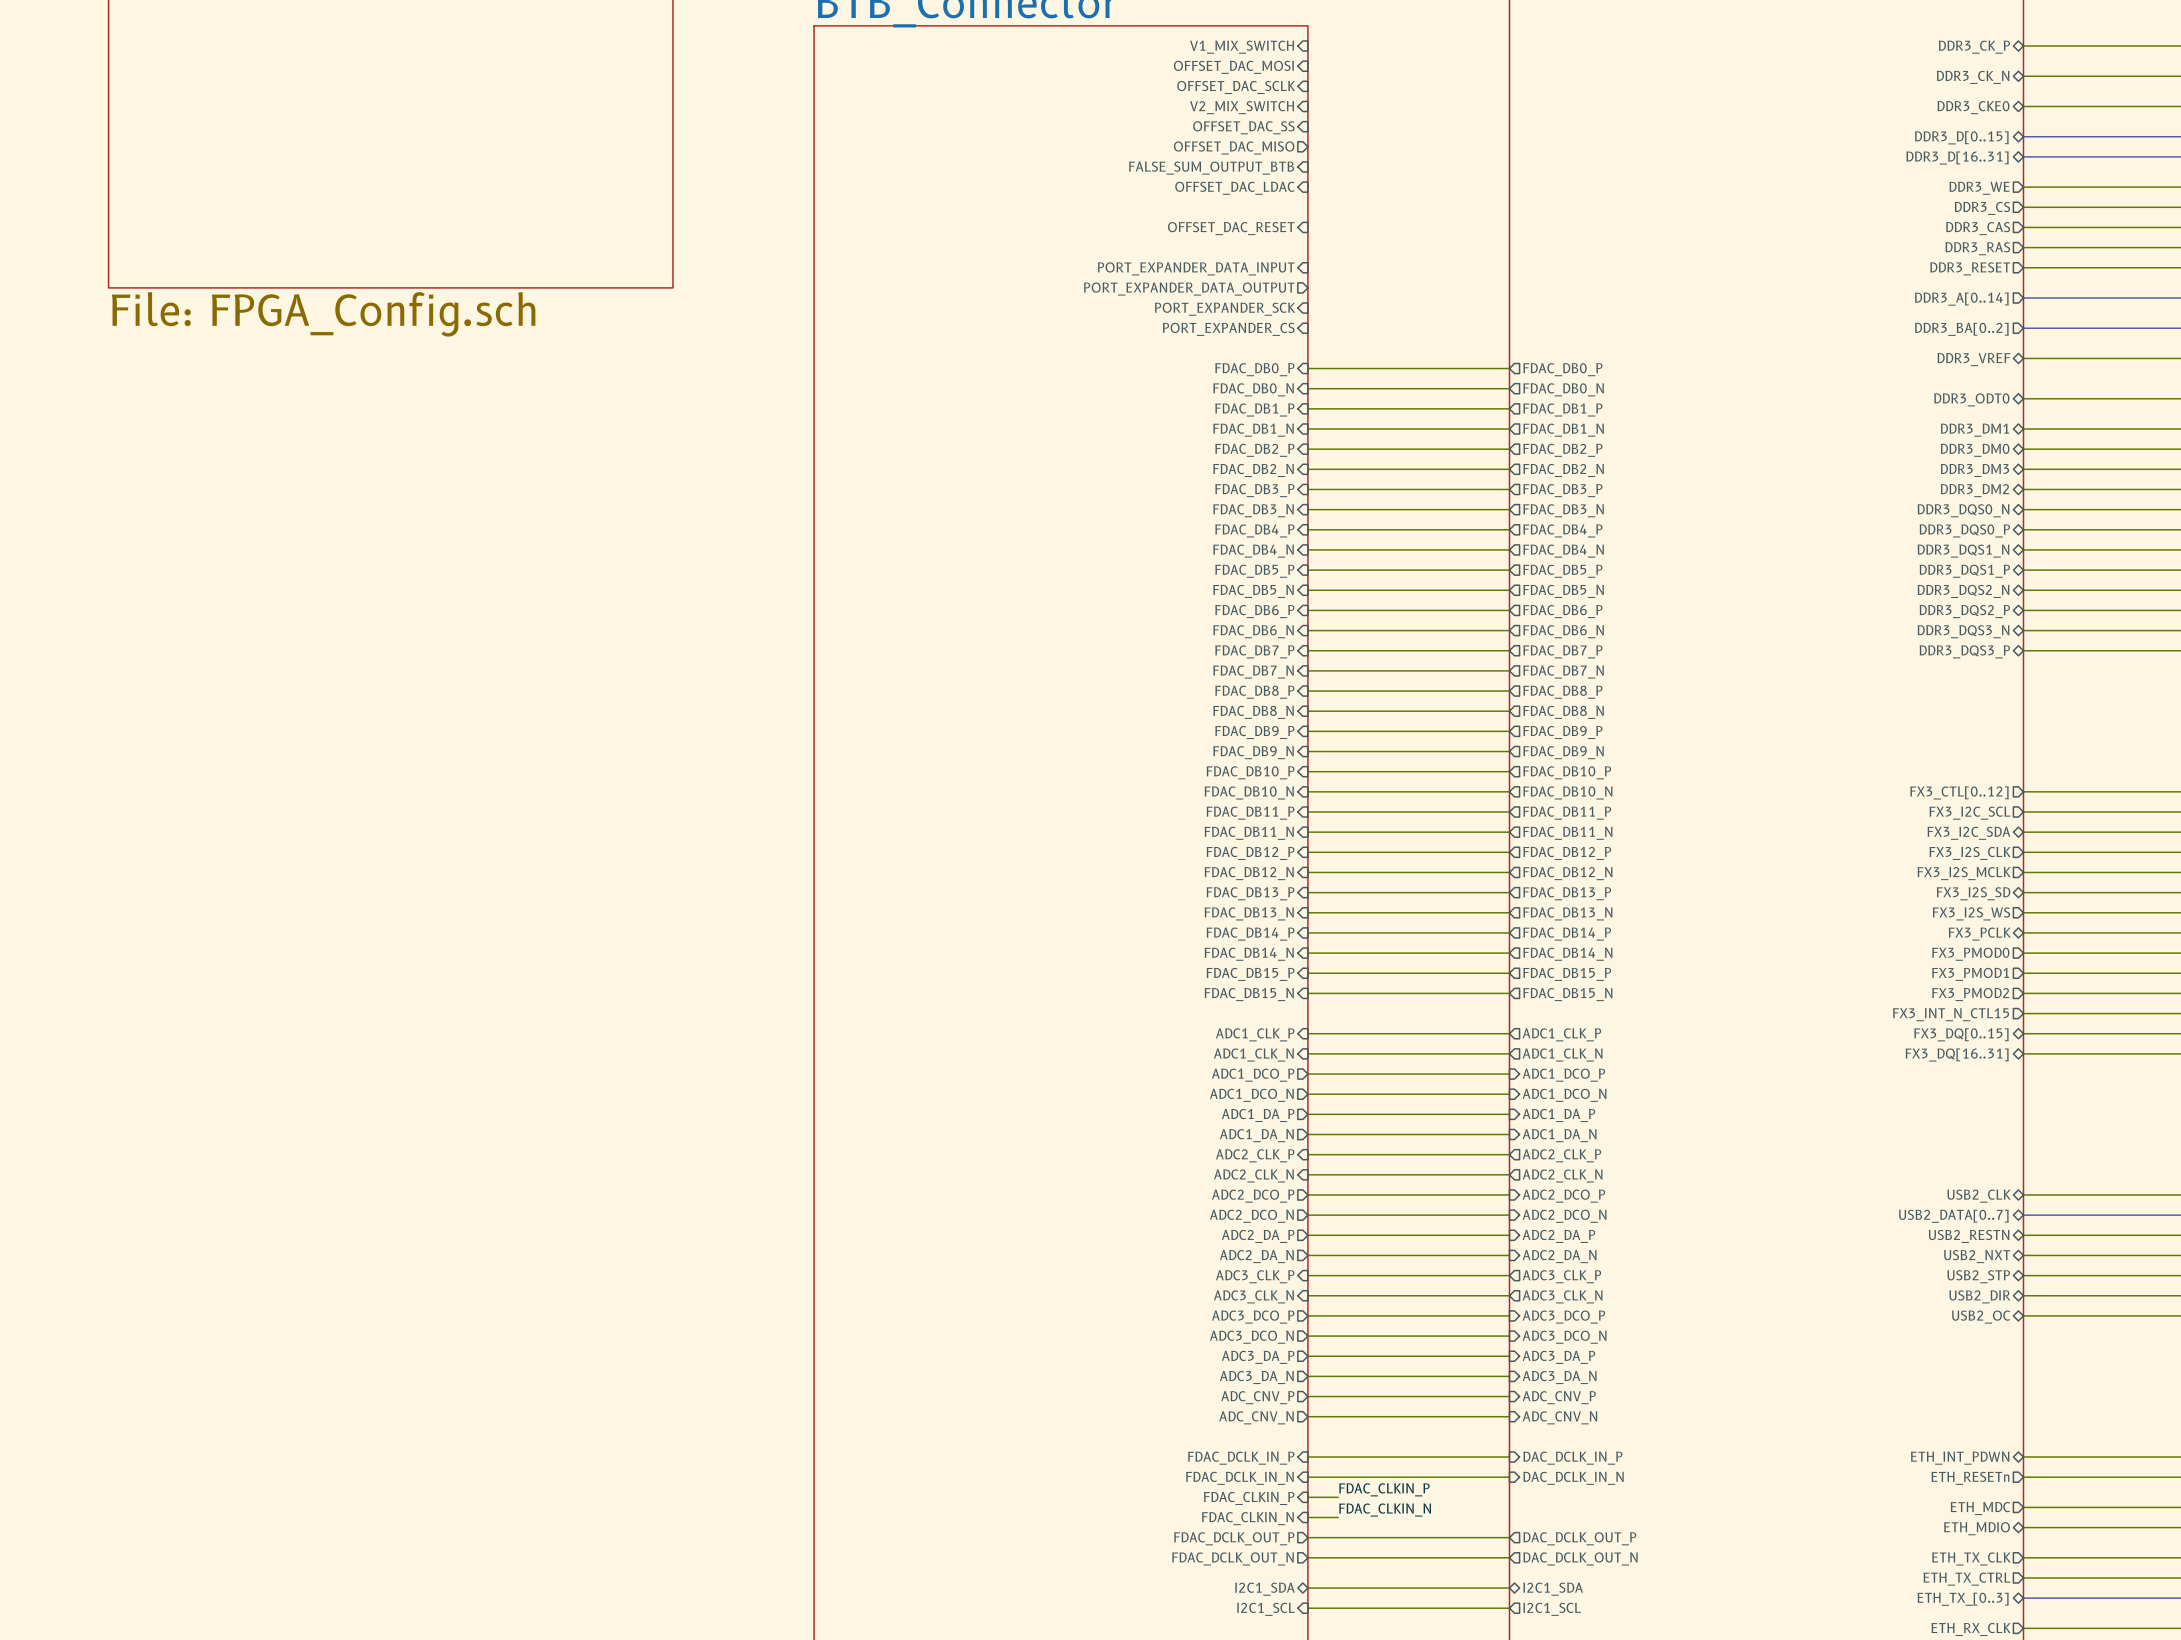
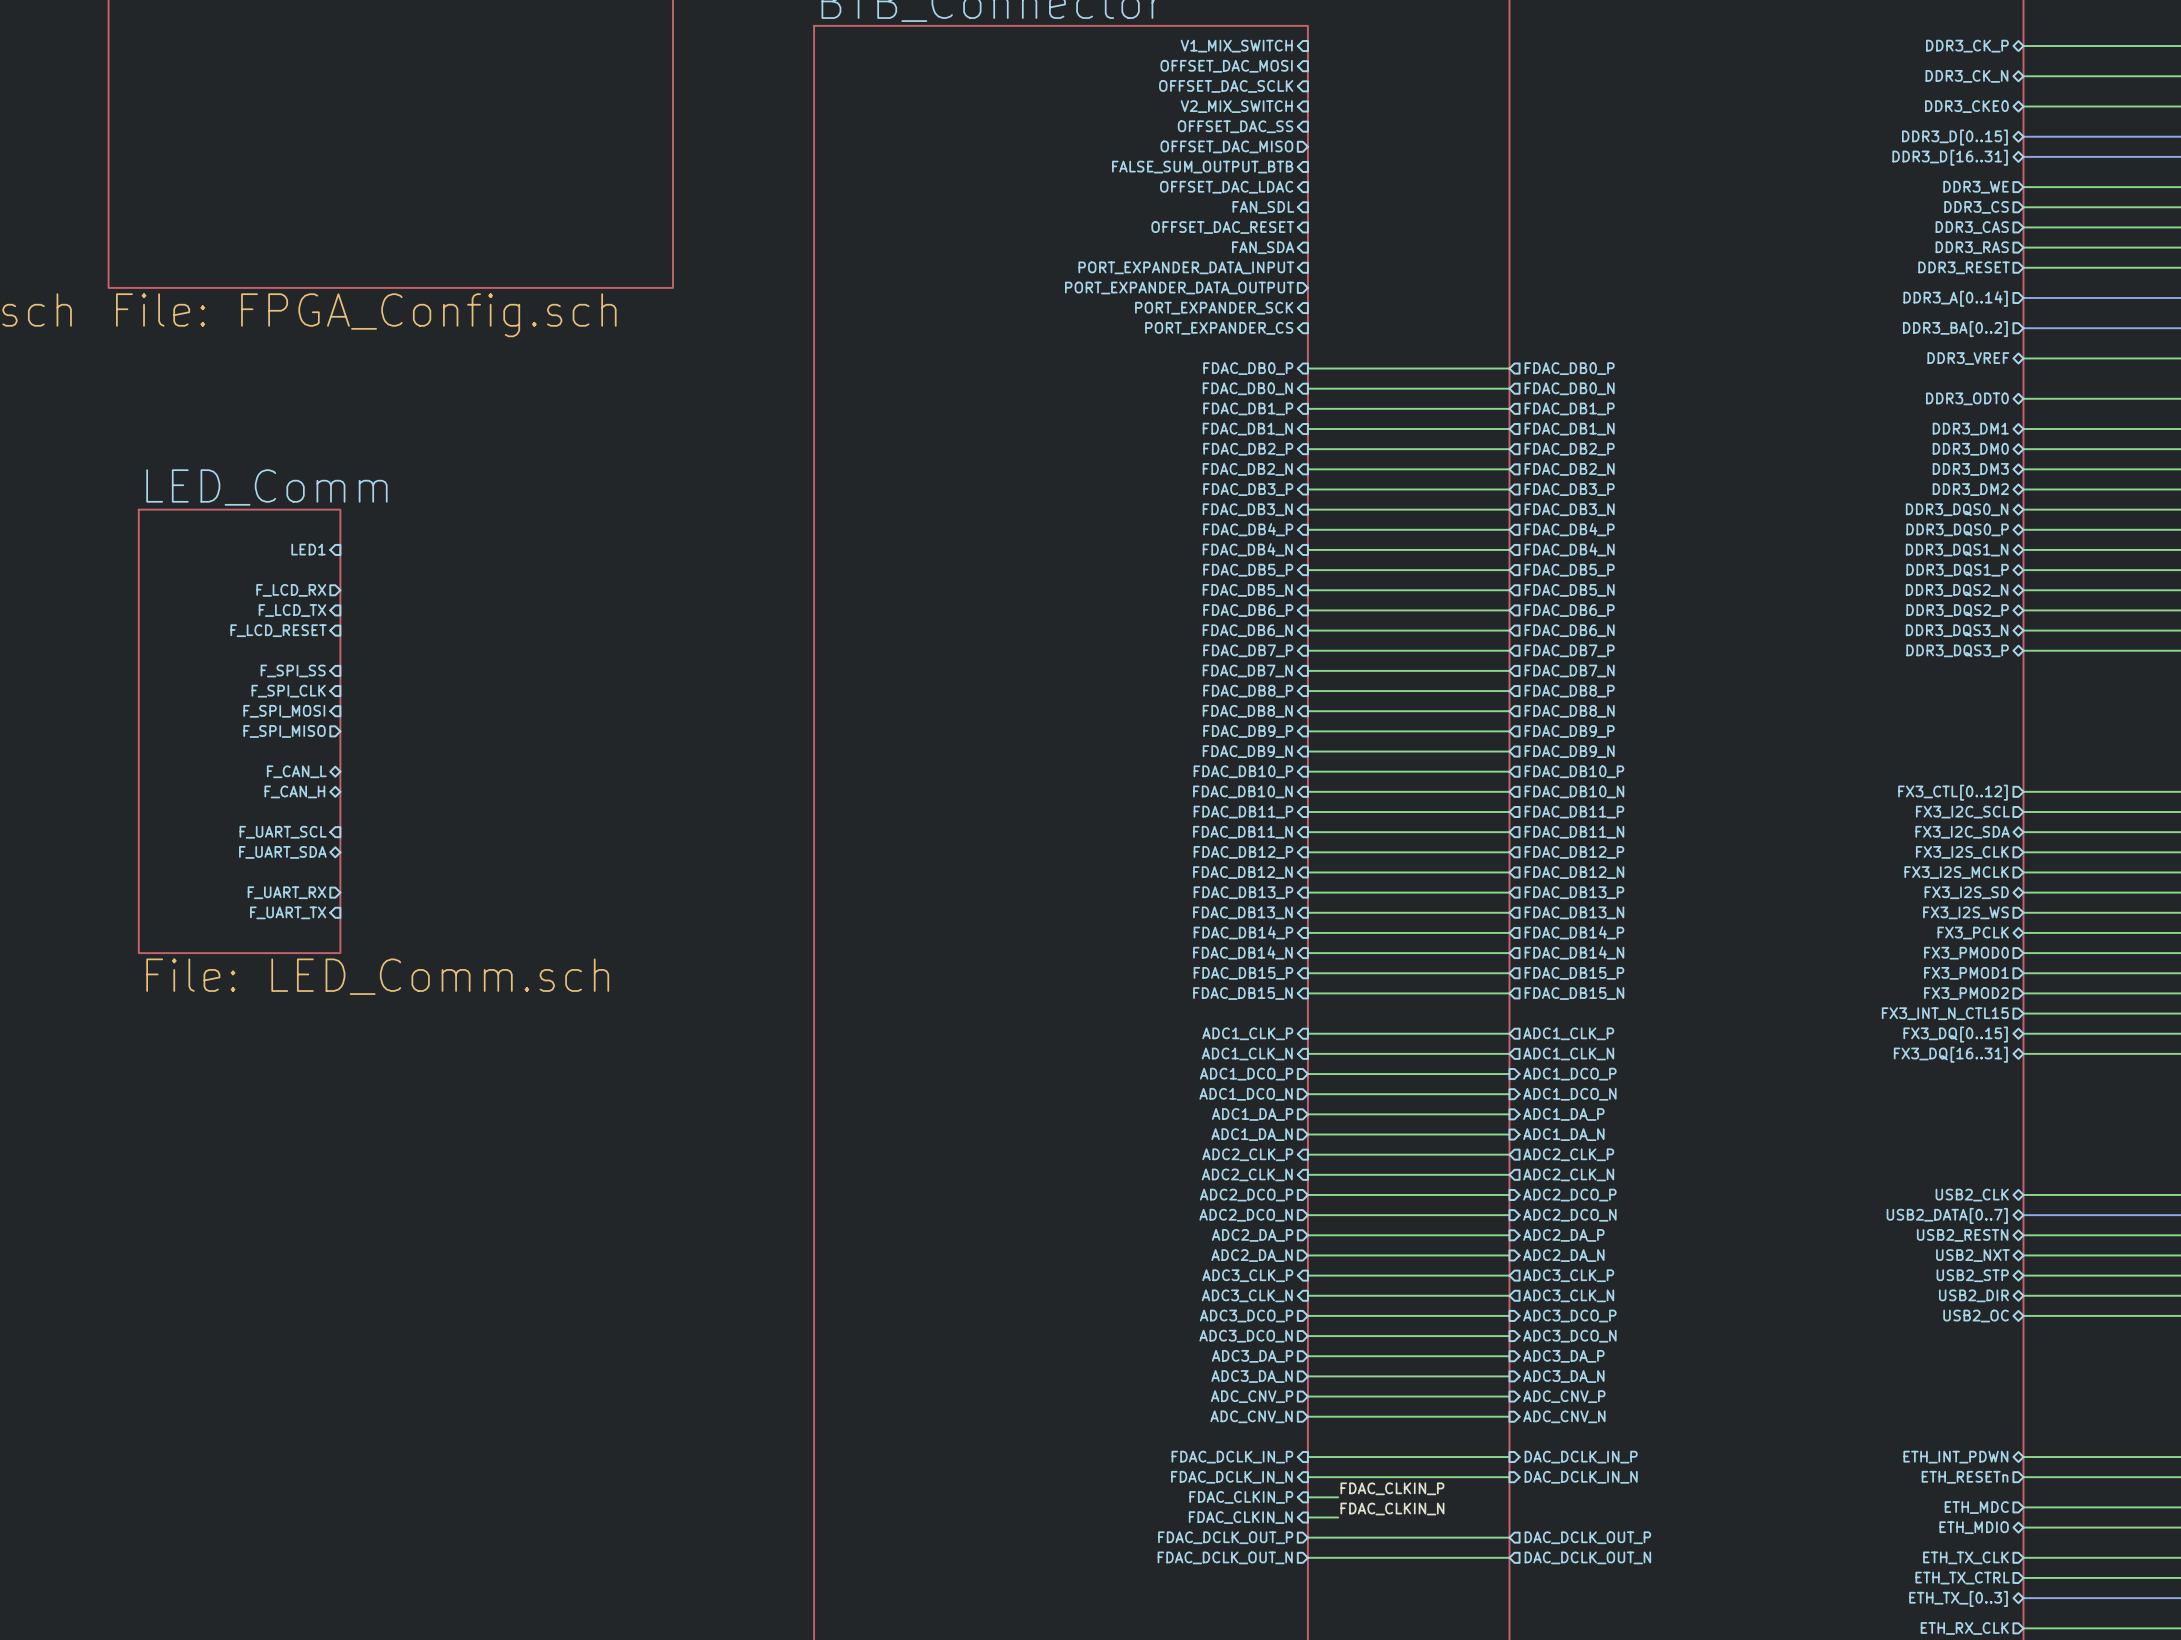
sheet pin: none -> FAN_SDL (1263, 207)
sheet pin: none -> FAN_SDA (1263, 247)
sheet pin: none -> LED1 (308, 549)
sheet pin: none -> F_LCD_RX (291, 590)
sheet pin: none -> F_LCD_TX (292, 610)
sheet pin: none -> F_LCD_RESET (278, 630)
sheet pin: none -> F_SPI_SS (293, 671)
sheet pin: none -> F_SPI_CLK (288, 691)
sheet pin: none -> F_SPI_MOSI (284, 711)
sheet LED_Comm: none -> File: LED_Comm.sch (239, 731)
sheet pin: none -> F_SPI_MISO (284, 731)
sheet pin: none -> F_CAN_L (296, 771)
sheet pin: none -> F_CAN_H (294, 791)
sheet pin: none -> F_UART_SCL (283, 832)
sheet pin: none -> F_UART_SDA (282, 852)
sheet pin: none -> F_UART_RX (286, 892)
sheet pin: none -> F_UART_TX (288, 912)
wire: (1307, 1588) (1509, 1588) -> none
sheet pin: I2C1_SDA (1264, 1589) -> none
sheet pin: I2C1_SDA (1553, 1589) -> none
wire: (1307, 1608) (1509, 1608) -> none
sheet pin: I2C1_SCL (1265, 1609) -> none
sheet pin: I2C1_SCL (1552, 1609) -> none

